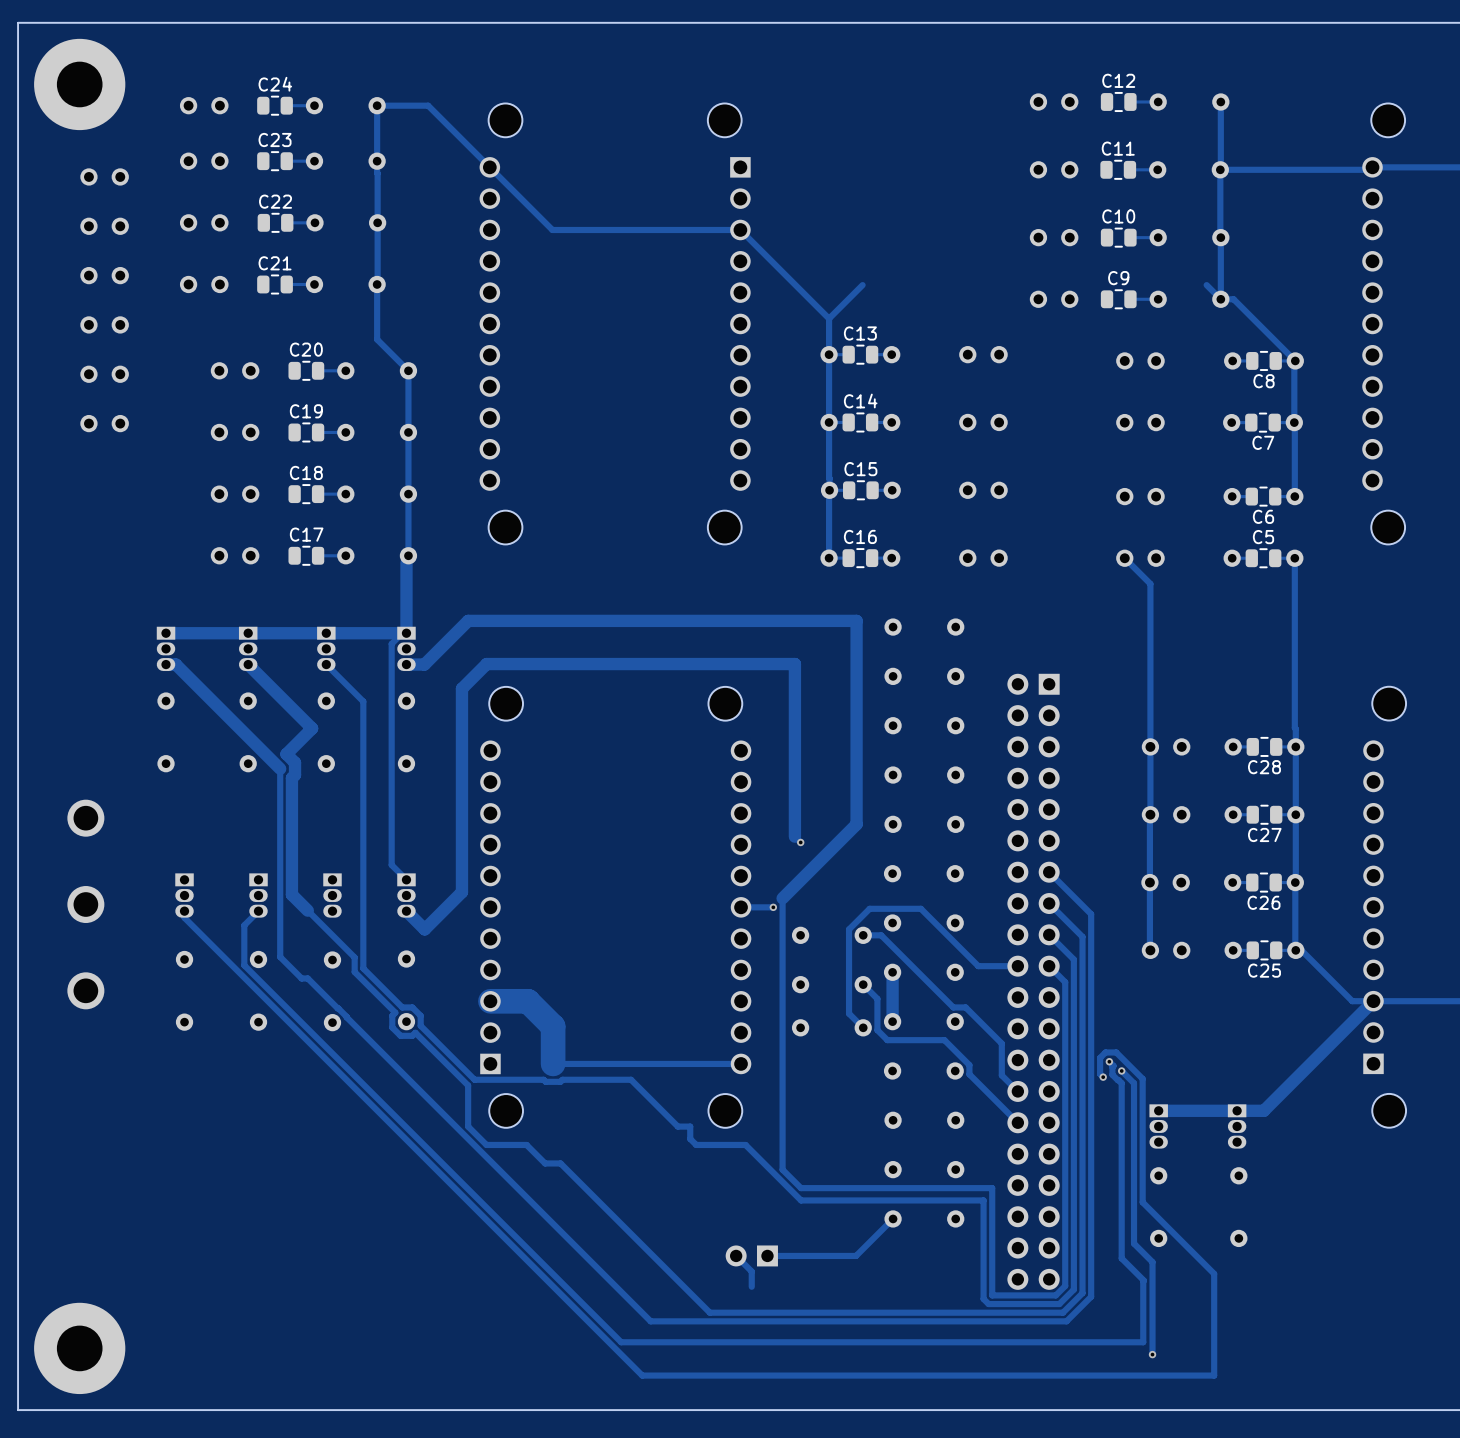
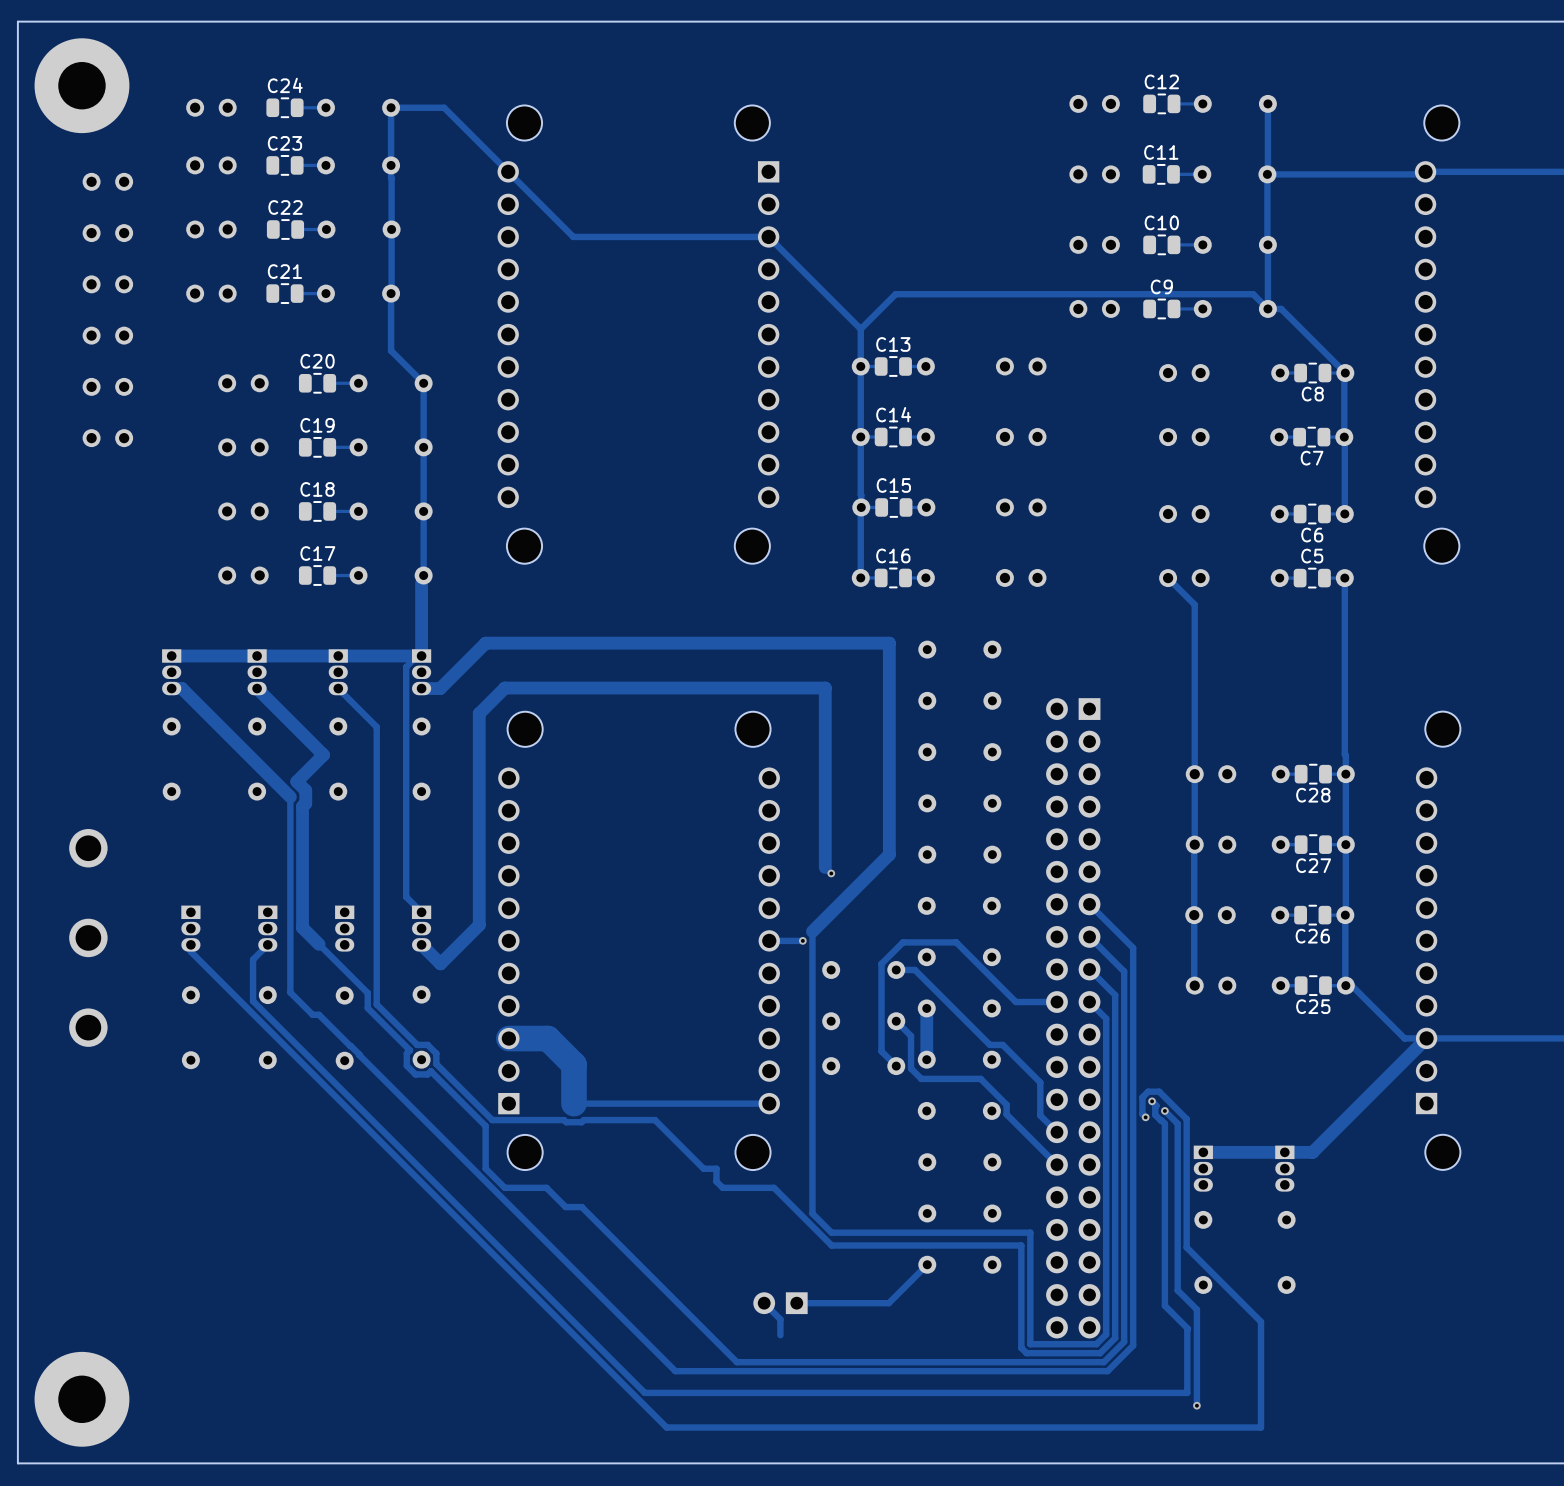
track: none -> (1253, 294) (895, 294)

